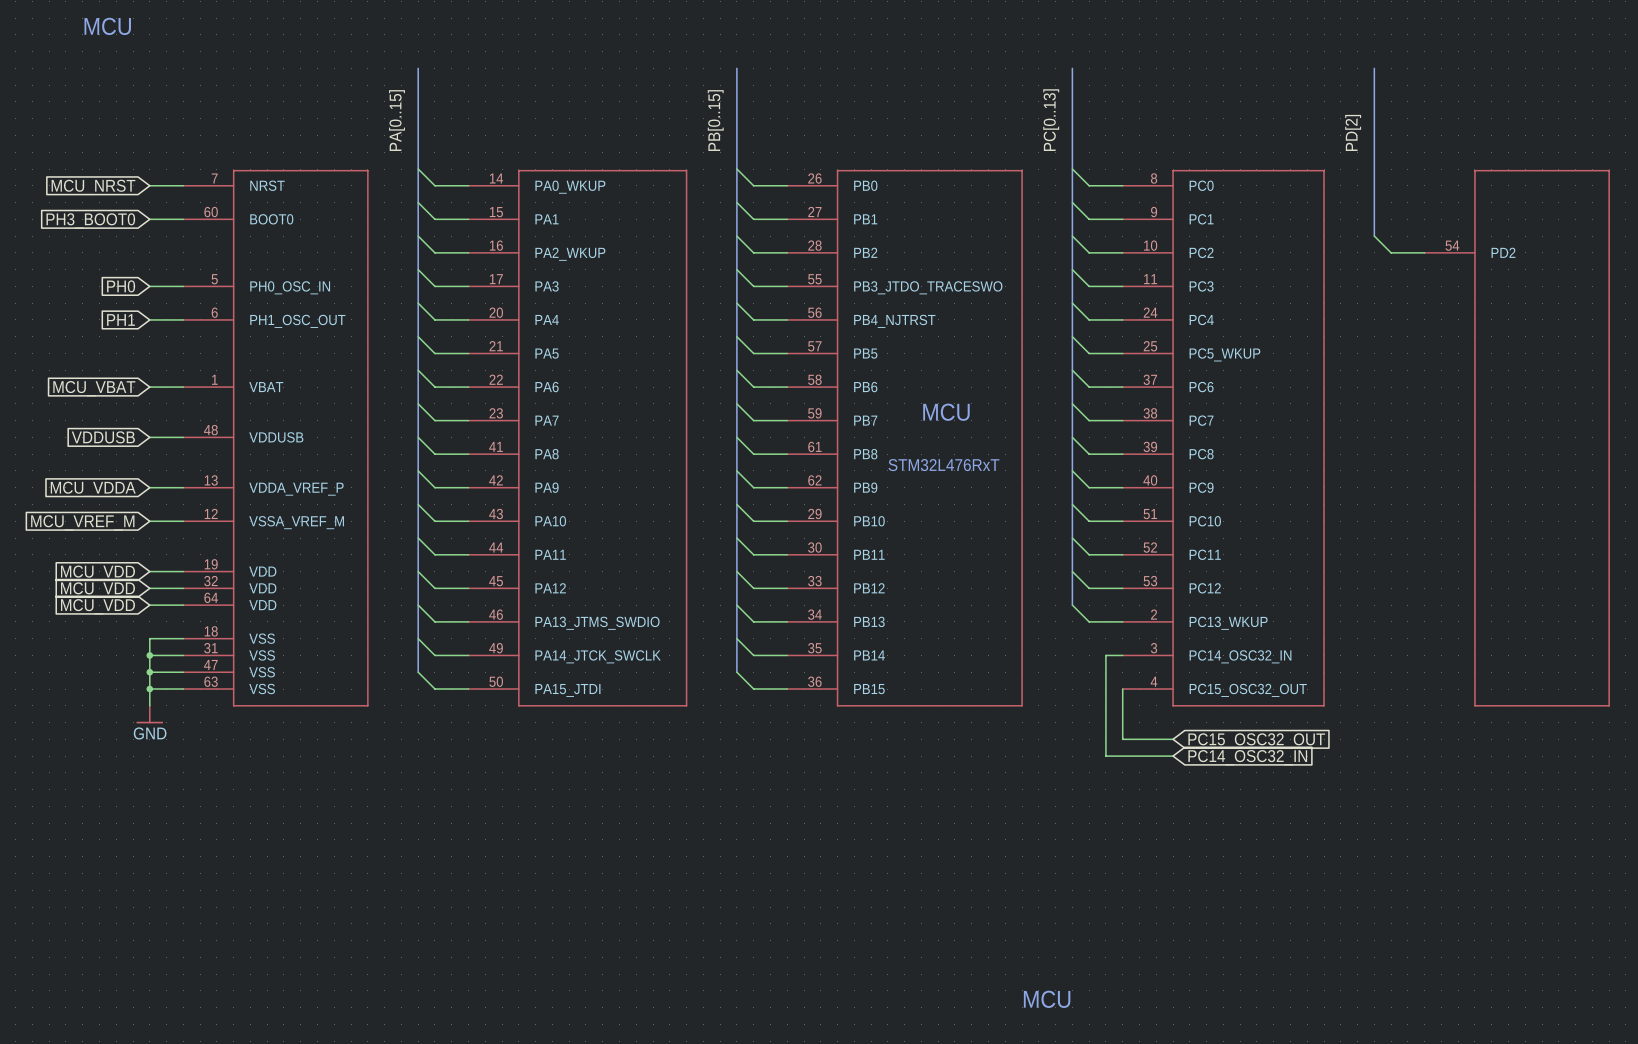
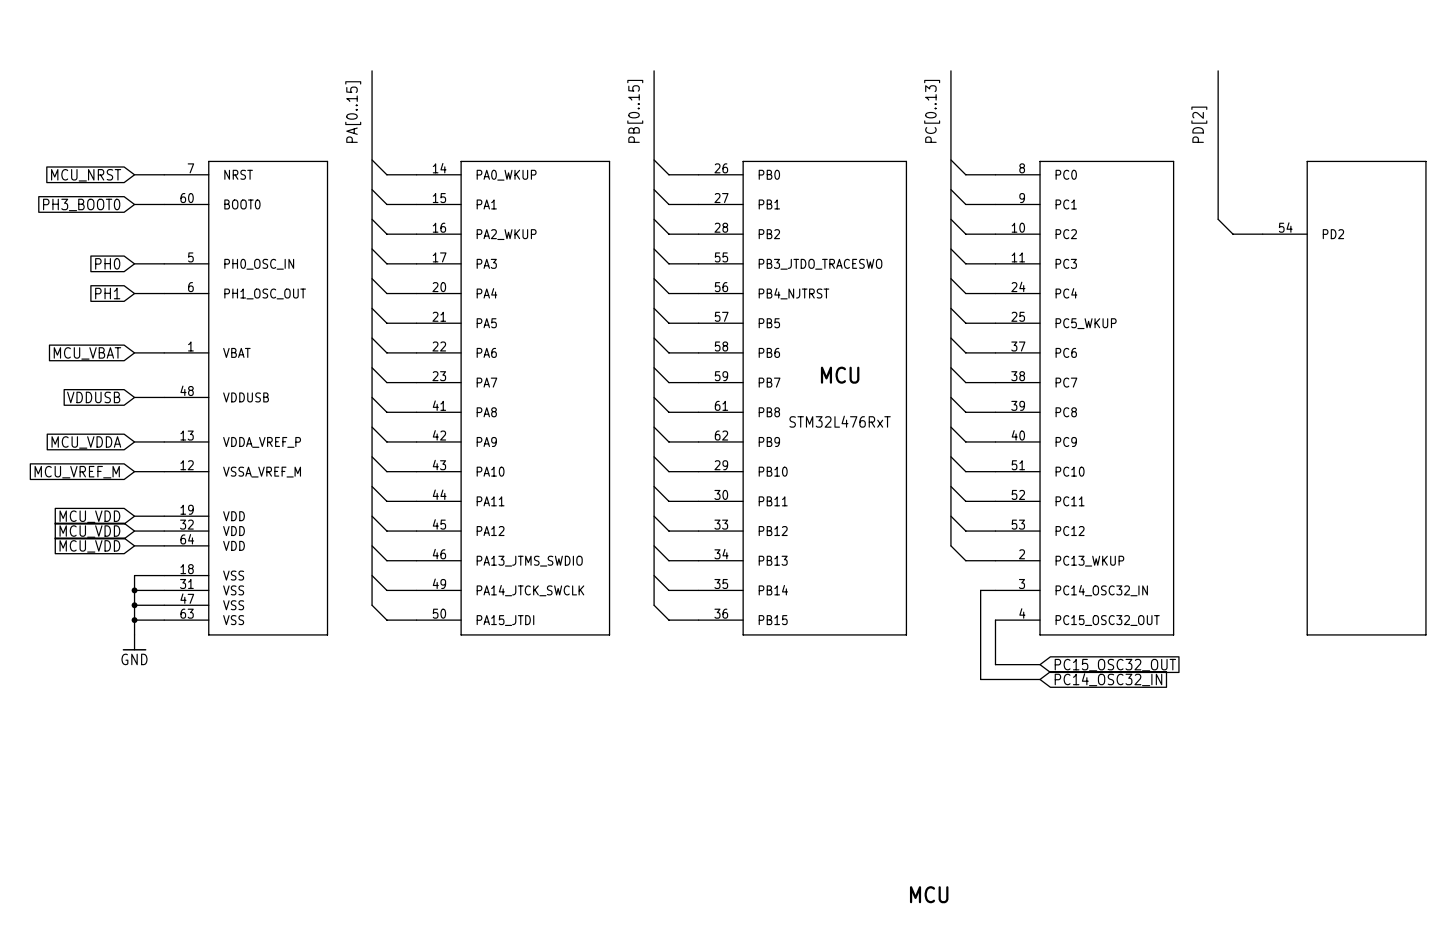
text: MCU (107, 26) -> none

